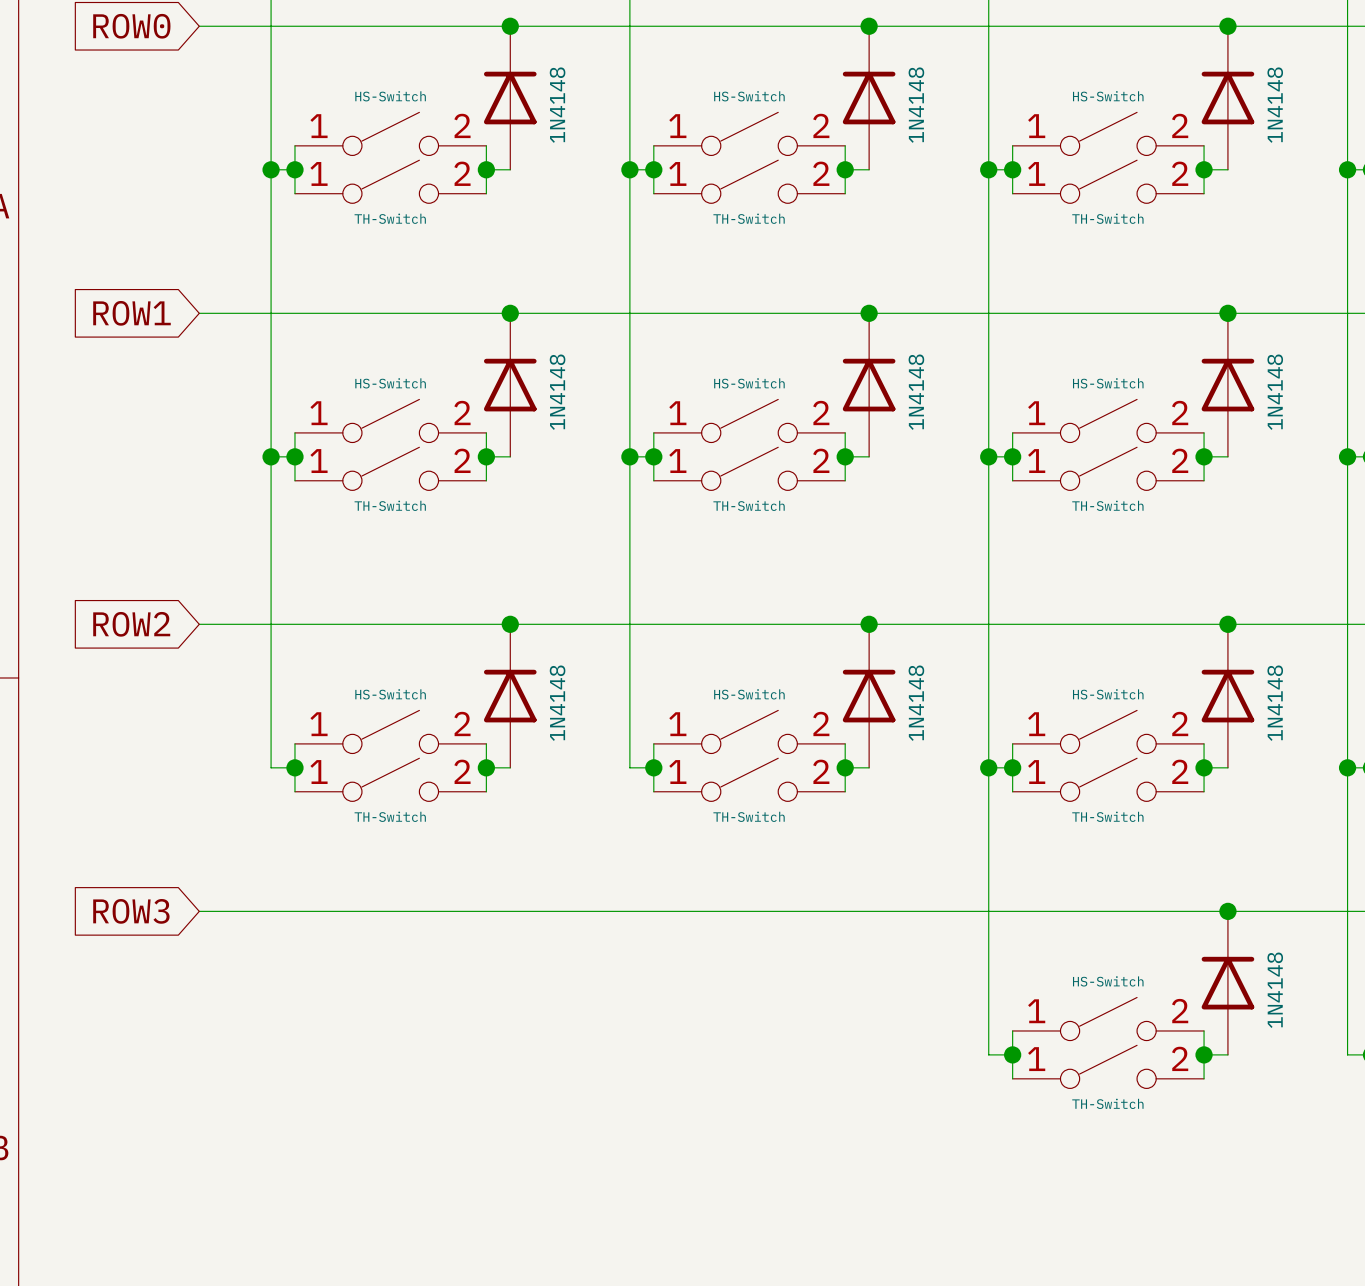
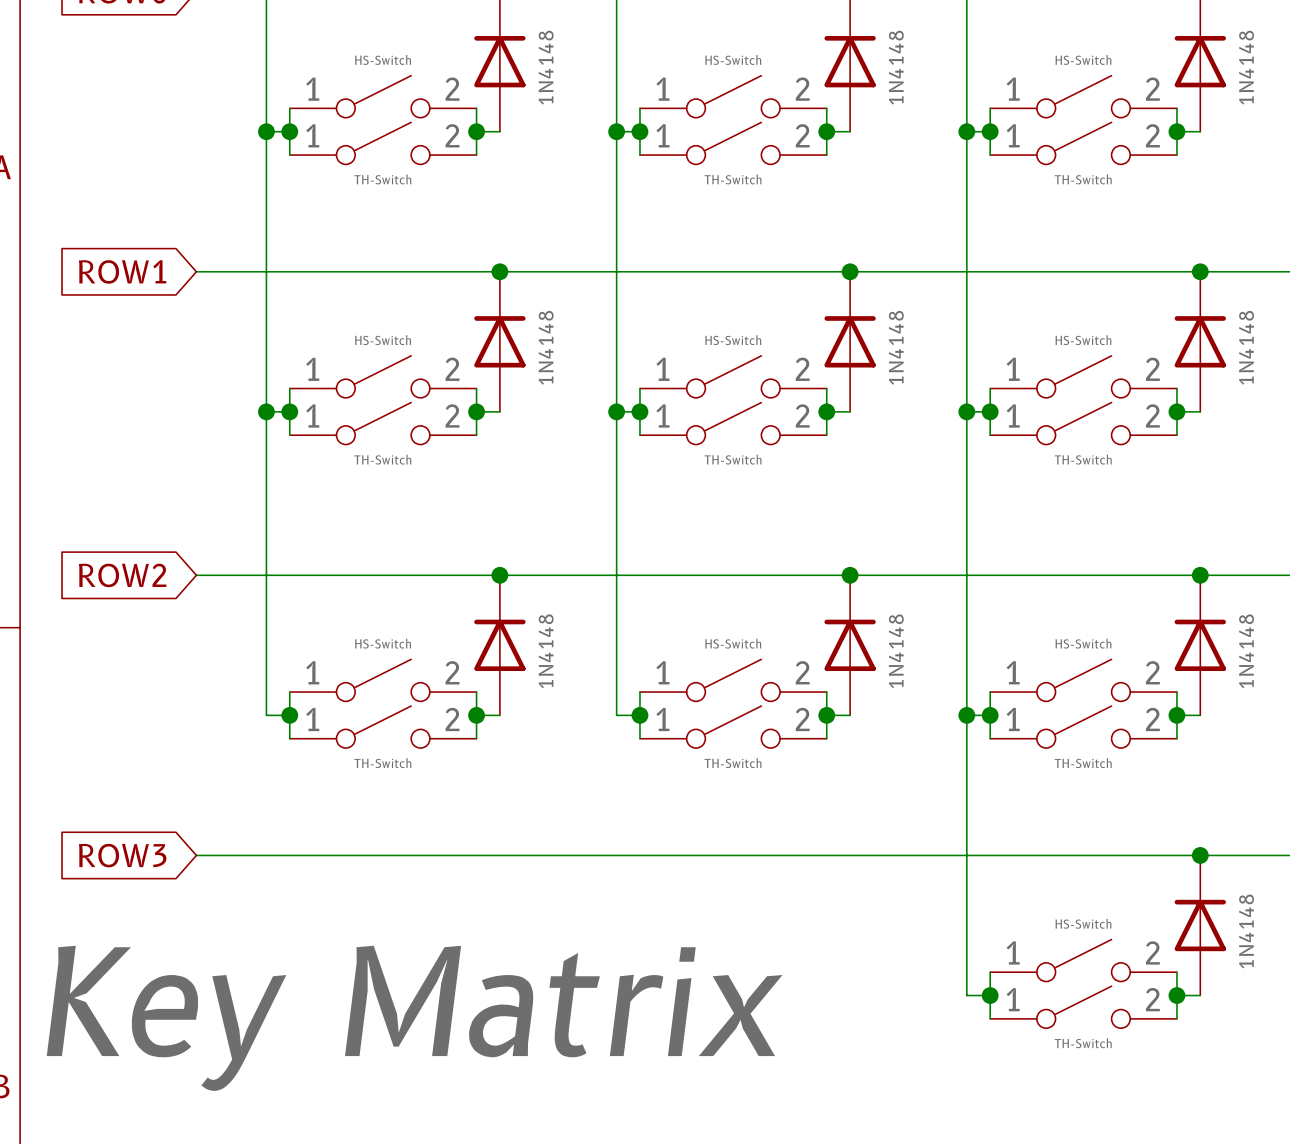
label: none -> Key Matrix (414, 1018)

